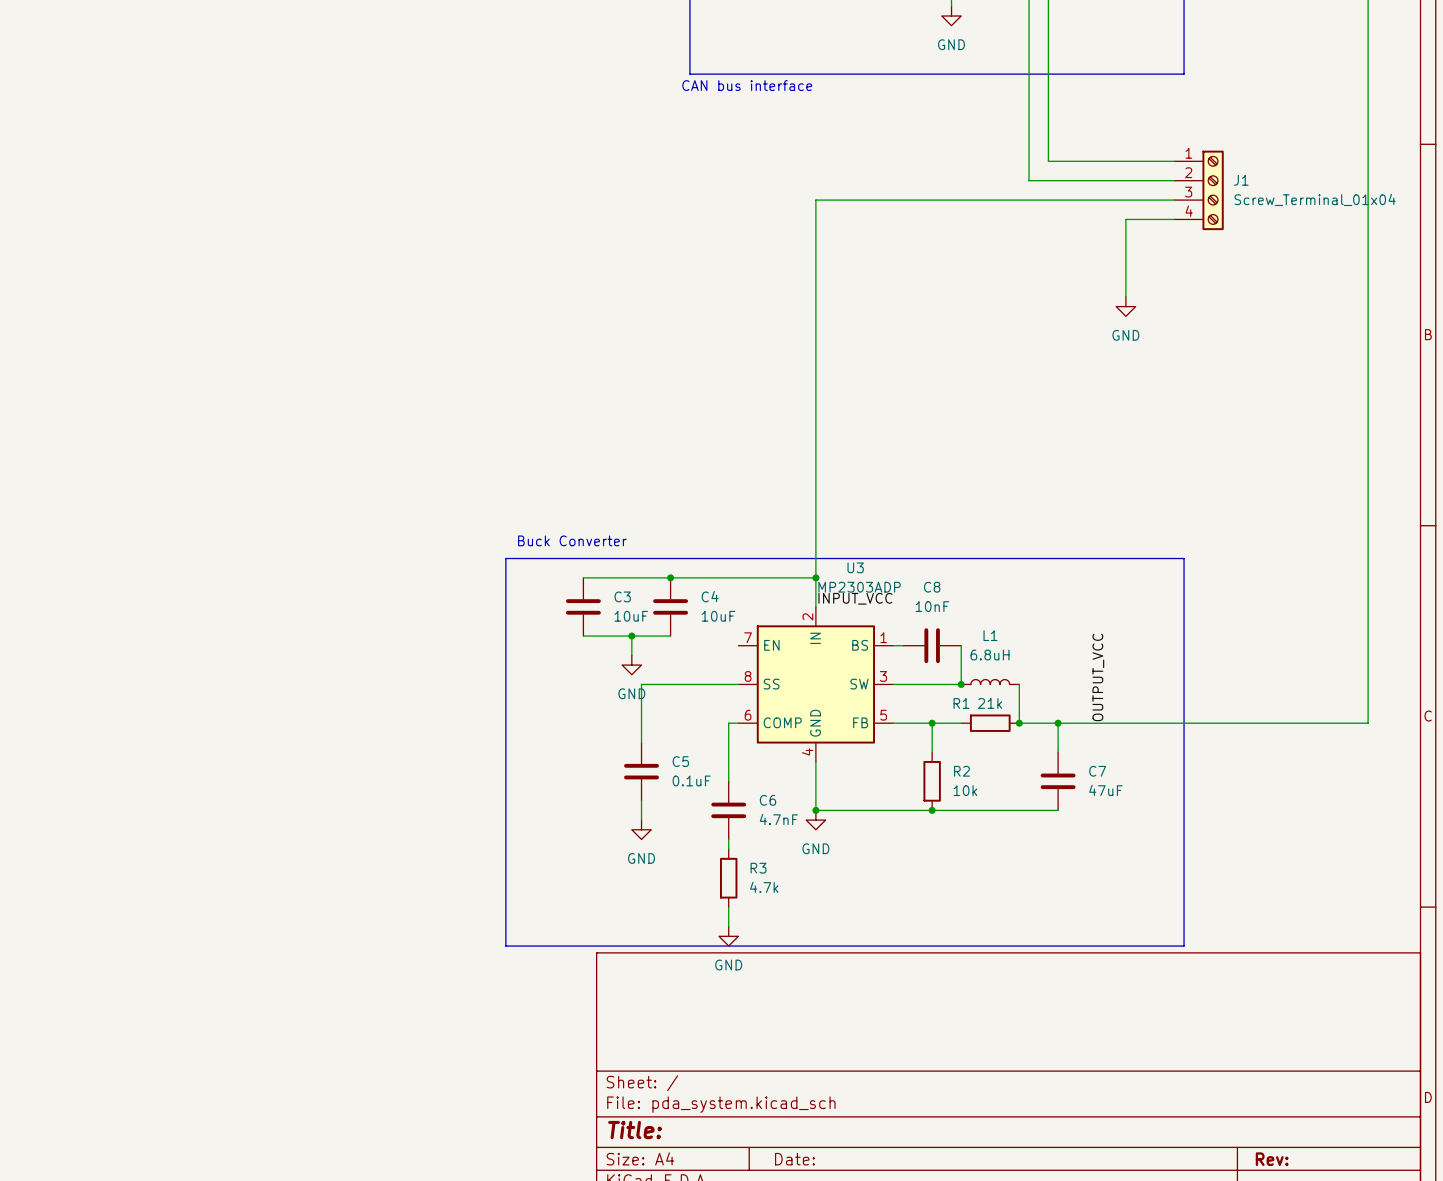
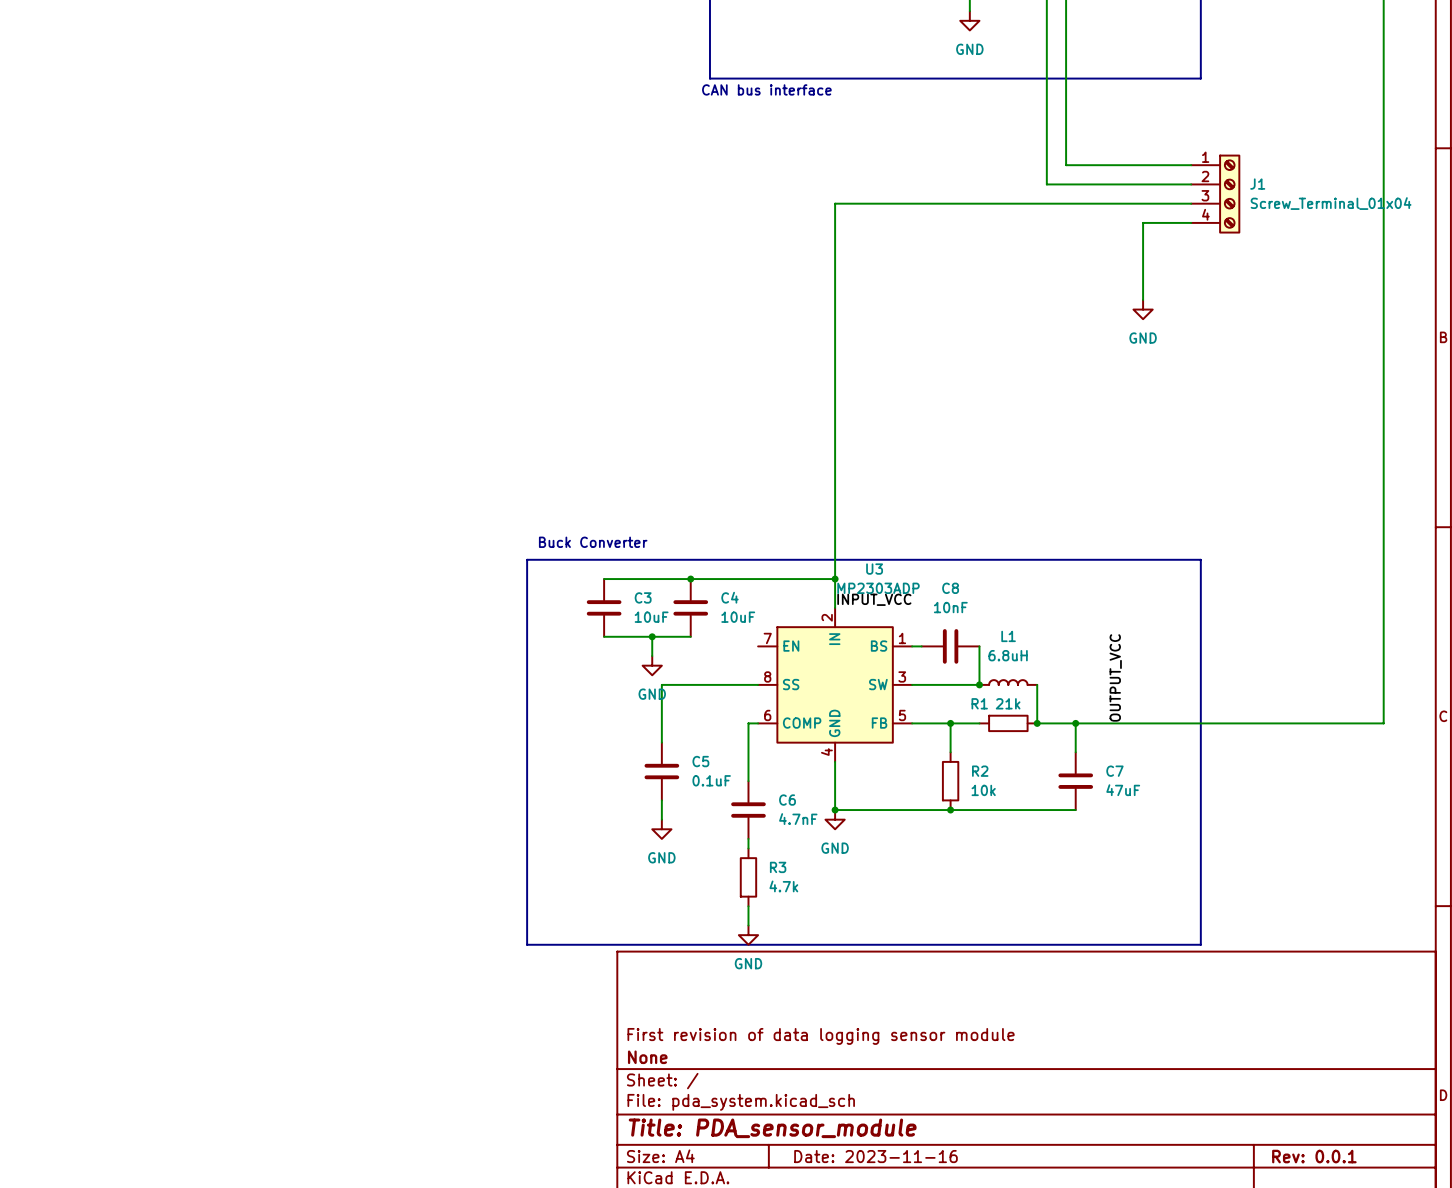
title block: none -> First revision of data logging sensor module (821, 1036)
title block: none -> None (647, 1057)
title block: Title: (635, 1130) -> Title: PDA_sensor_module (772, 1128)
title block: Date: (794, 1159) -> Date: 2023-11-16 (875, 1156)
title block: Rev: (1272, 1159) -> Rev: 0.0.1 (1314, 1156)

